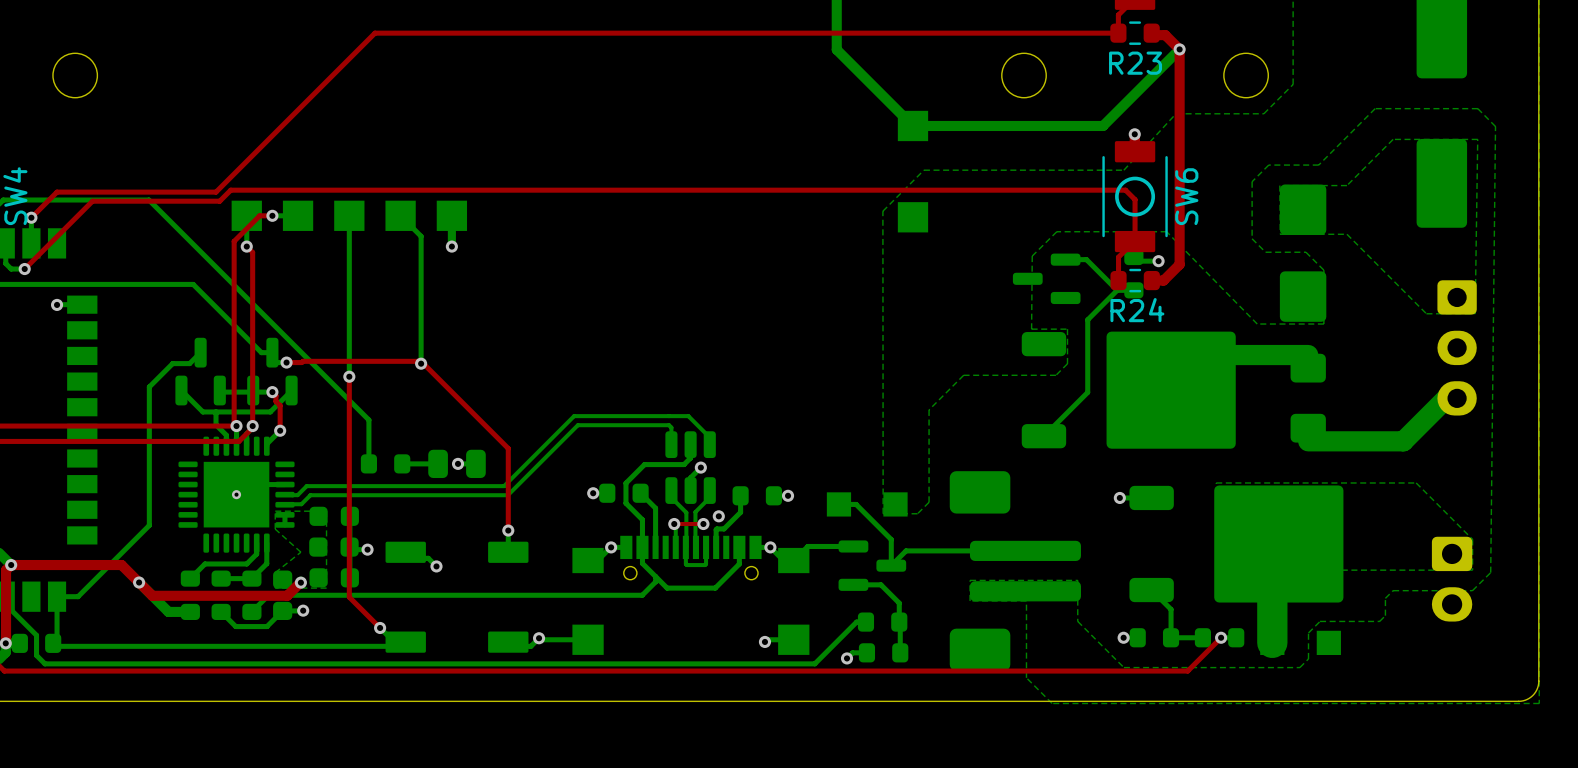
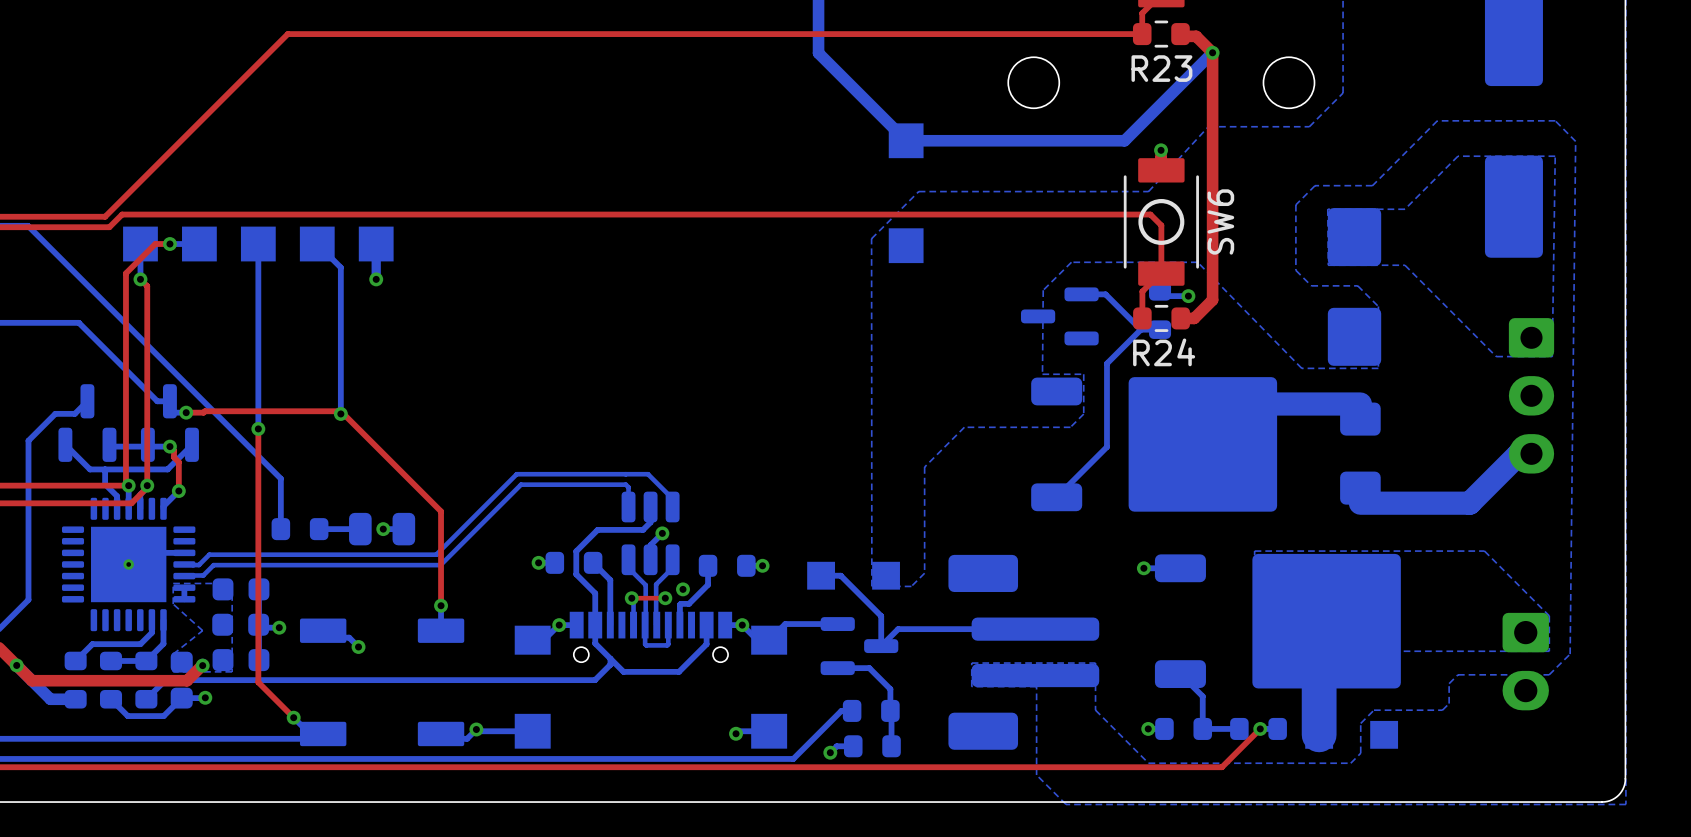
part footprint: [949, 471, 1081, 672] -> [948, 554, 1100, 750]

